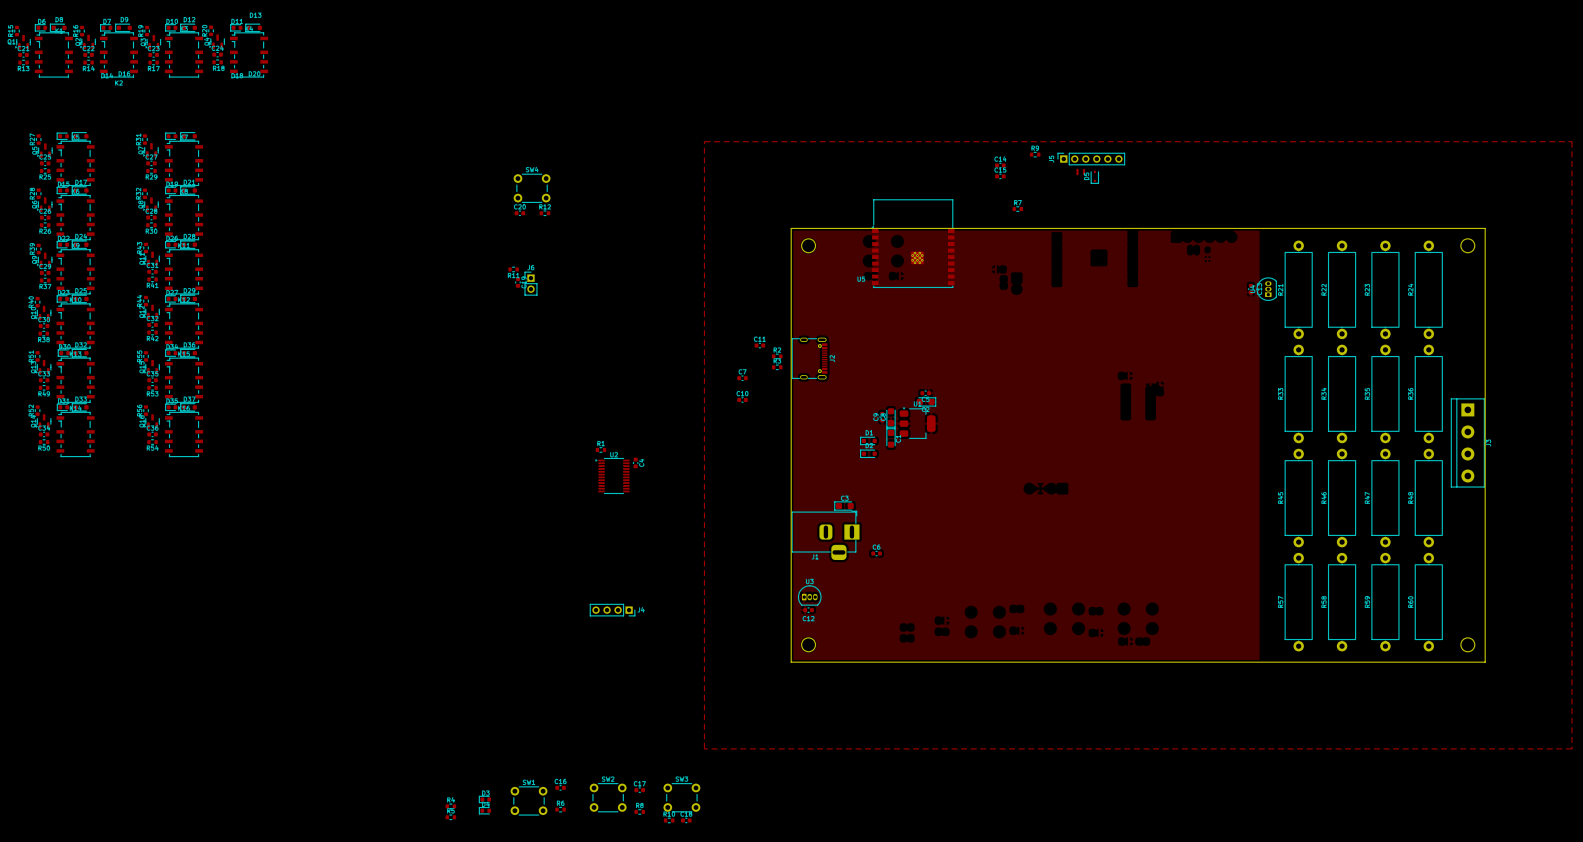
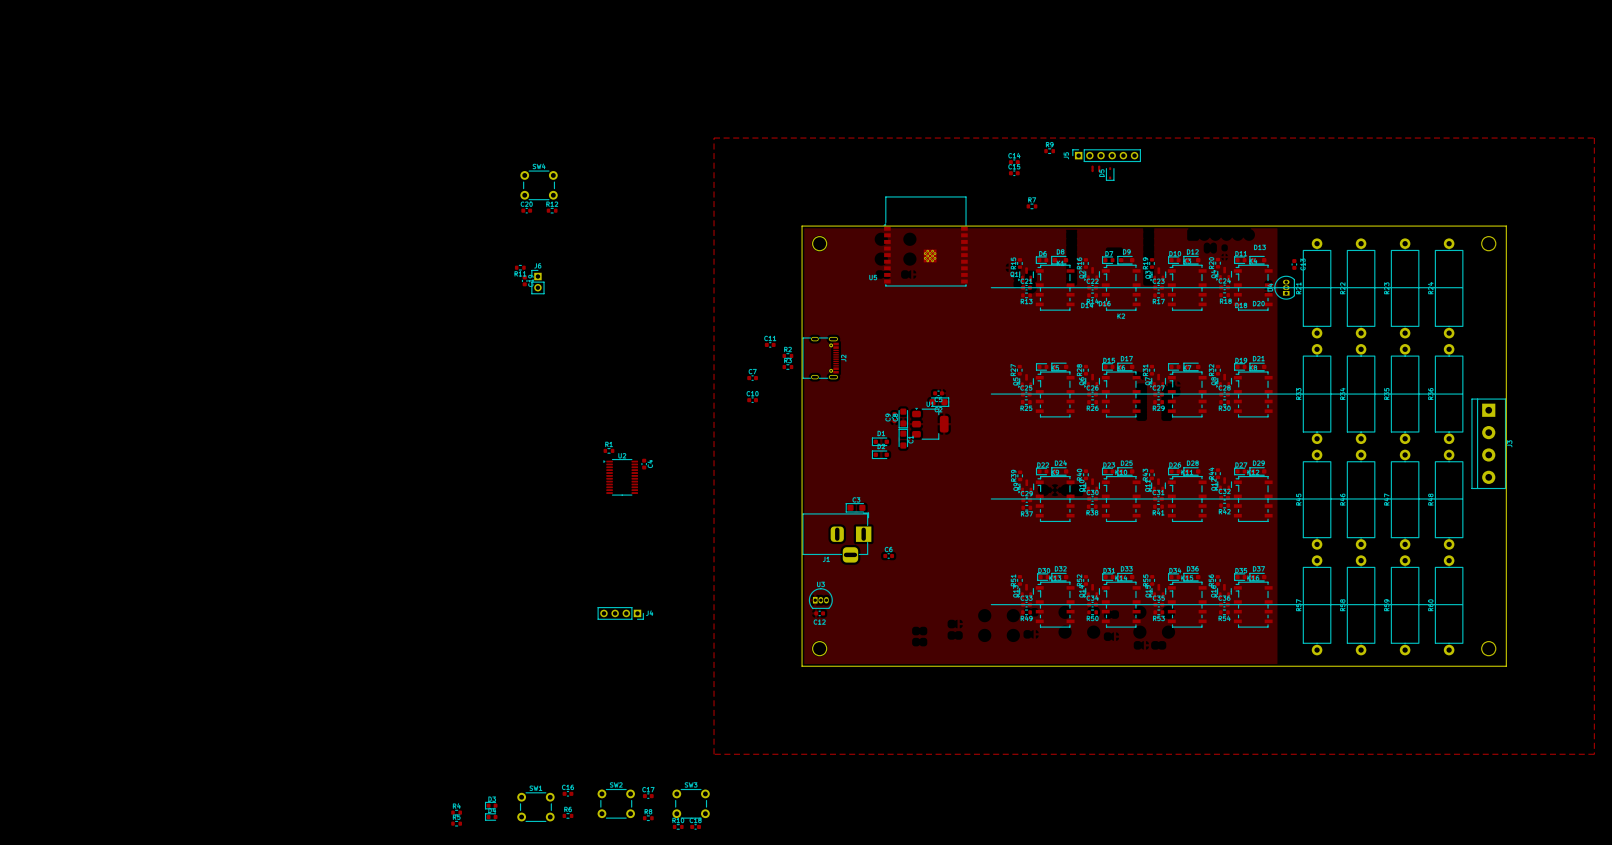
part position: (41, 27) -> (1042, 260)
part position: (58, 27) -> (1059, 260)
part position: (106, 27) -> (1108, 260)
part position: (123, 27) -> (1125, 260)
part position: (171, 27) -> (1174, 260)
part position: (188, 27) -> (1192, 260)
part position: (236, 27) -> (1240, 260)
part position: (253, 27) -> (1258, 260)
part position: (211, 30) -> (1218, 263)
part position: (17, 31) -> (1019, 263)
part position: (82, 31) -> (1085, 263)
part position: (147, 31) -> (1151, 263)
part position: (87, 41) -> (1091, 274)
part position: (216, 41) -> (1224, 274)
part position: (22, 42) -> (1025, 274)
part position: (153, 42) -> (1158, 274)
part position: (23, 54) -> (1026, 287)
part position: (53, 54) -> (1055, 287)
part position: (88, 54) -> (1092, 287)
part position: (118, 54) -> (1121, 287)
part position: (153, 54) -> (1158, 287)
part position: (183, 54) -> (1187, 287)
part position: (217, 54) -> (1224, 287)
part position: (249, 54) -> (1253, 287)
part position: (23, 62) -> (1026, 295)
part position: (88, 62) -> (1092, 295)
part position: (153, 62) -> (1158, 295)
part position: (217, 62) -> (1224, 295)
part position: (62, 136) -> (1042, 366)
part position: (80, 136) -> (1059, 366)
part position: (171, 136) -> (1174, 366)
part position: (188, 136) -> (1192, 366)
part position: (38, 139) -> (1019, 370)
part position: (144, 139) -> (1151, 370)
part position: (44, 150) -> (1025, 381)
part position: (150, 150) -> (1157, 381)
part position: (45, 163) -> (1026, 394)
part position: (75, 163) -> (1055, 394)
part position: (151, 163) -> (1158, 394)
part position: (183, 163) -> (1187, 394)
part position: (45, 170) -> (1026, 402)
part position: (151, 170) -> (1158, 402)
part position: (62, 190) -> (1108, 366)
part position: (80, 190) -> (1125, 366)
part position: (171, 190) -> (1240, 366)
part position: (188, 190) -> (1258, 366)
part position: (38, 193) -> (1085, 370)
part position: (144, 193) -> (1218, 370)
part position: (44, 204) -> (1091, 381)
part position: (150, 204) -> (1224, 381)
part position: (45, 217) -> (1092, 394)
part position: (75, 217) -> (1121, 394)
part position: (151, 217) -> (1224, 394)
part position: (183, 217) -> (1253, 394)
part position: (45, 225) -> (1092, 402)
part position: (151, 225) -> (1224, 402)
part position: (62, 244) -> (1042, 471)
part position: (80, 244) -> (1059, 471)
part position: (171, 244) -> (1174, 471)
part position: (188, 244) -> (1192, 471)
part position: (146, 247) -> (1151, 474)
part position: (38, 249) -> (1020, 475)
part position: (151, 258) -> (1157, 485)
part position: (44, 259) -> (1026, 486)
part position: (75, 271) -> (1055, 498)
part position: (152, 271) -> (1158, 498)
part position: (183, 271) -> (1187, 498)
part position: (45, 272) -> (1026, 500)
part position: (152, 279) -> (1158, 506)
part position: (45, 280) -> (1026, 507)
line: none -> (991, 287) (1462, 287)
part position: (1250, 289) -> (1294, 264)
part position: (62, 298) -> (1108, 471)
part position: (80, 298) -> (1125, 471)
part position: (171, 298) -> (1240, 471)
part position: (188, 298) -> (1258, 471)
part position: (146, 301) -> (1218, 473)
part position: (37, 302) -> (1085, 474)
part position: (151, 311) -> (1224, 484)
part position: (43, 313) -> (1091, 485)
part position: (152, 324) -> (1224, 497)
part position: (44, 326) -> (1092, 498)
part position: (75, 326) -> (1121, 498)
part position: (183, 326) -> (1253, 498)
part position: (152, 332) -> (1224, 505)
part position: (43, 333) -> (1092, 506)
part position: (64, 353) -> (1043, 577)
part position: (80, 353) -> (1059, 577)
part position: (171, 353) -> (1174, 577)
part position: (188, 353) -> (1192, 577)
part position: (37, 356) -> (1019, 580)
part position: (146, 356) -> (1152, 580)
part position: (43, 367) -> (1025, 591)
part position: (151, 367) -> (1158, 591)
part position: (44, 380) -> (1026, 604)
part position: (75, 380) -> (1055, 604)
part position: (152, 380) -> (1158, 604)
part position: (183, 380) -> (1187, 604)
part position: (44, 387) -> (1026, 612)
part position: (152, 387) -> (1158, 612)
line: none -> (991, 394) (1462, 394)
part position: (63, 407) -> (1108, 577)
part position: (80, 407) -> (1125, 577)
part position: (171, 407) -> (1240, 577)
part position: (188, 407) -> (1258, 577)
part position: (37, 410) -> (1085, 580)
part position: (146, 410) -> (1217, 580)
part position: (43, 421) -> (1091, 591)
part position: (151, 421) -> (1223, 591)
part position: (44, 434) -> (1092, 604)
part position: (75, 434) -> (1121, 604)
part position: (152, 434) -> (1224, 604)
part position: (183, 434) -> (1253, 604)
part position: (44, 442) -> (1092, 612)
part position: (152, 442) -> (1224, 612)
line: none -> (991, 498) (1462, 498)
line: none -> (991, 604) (1462, 604)

